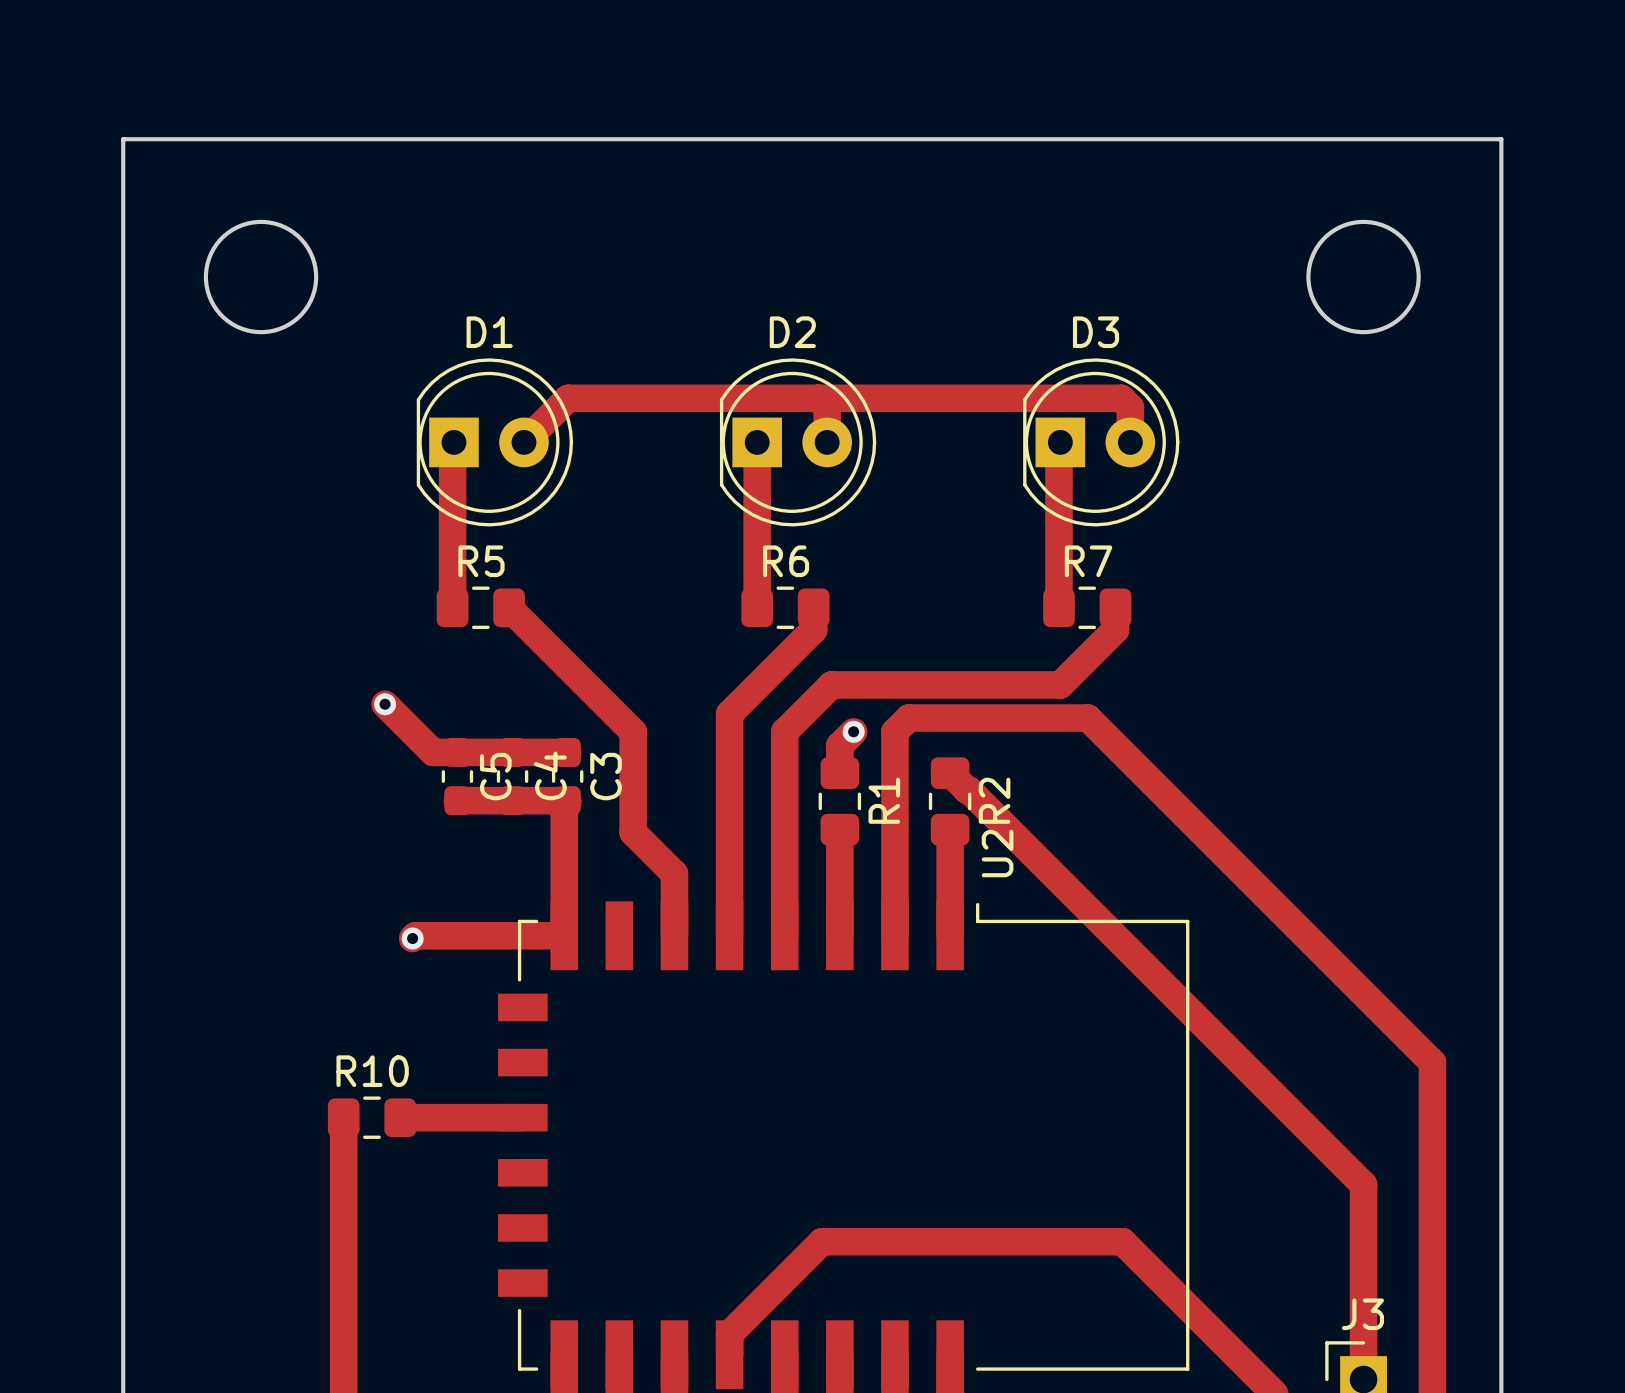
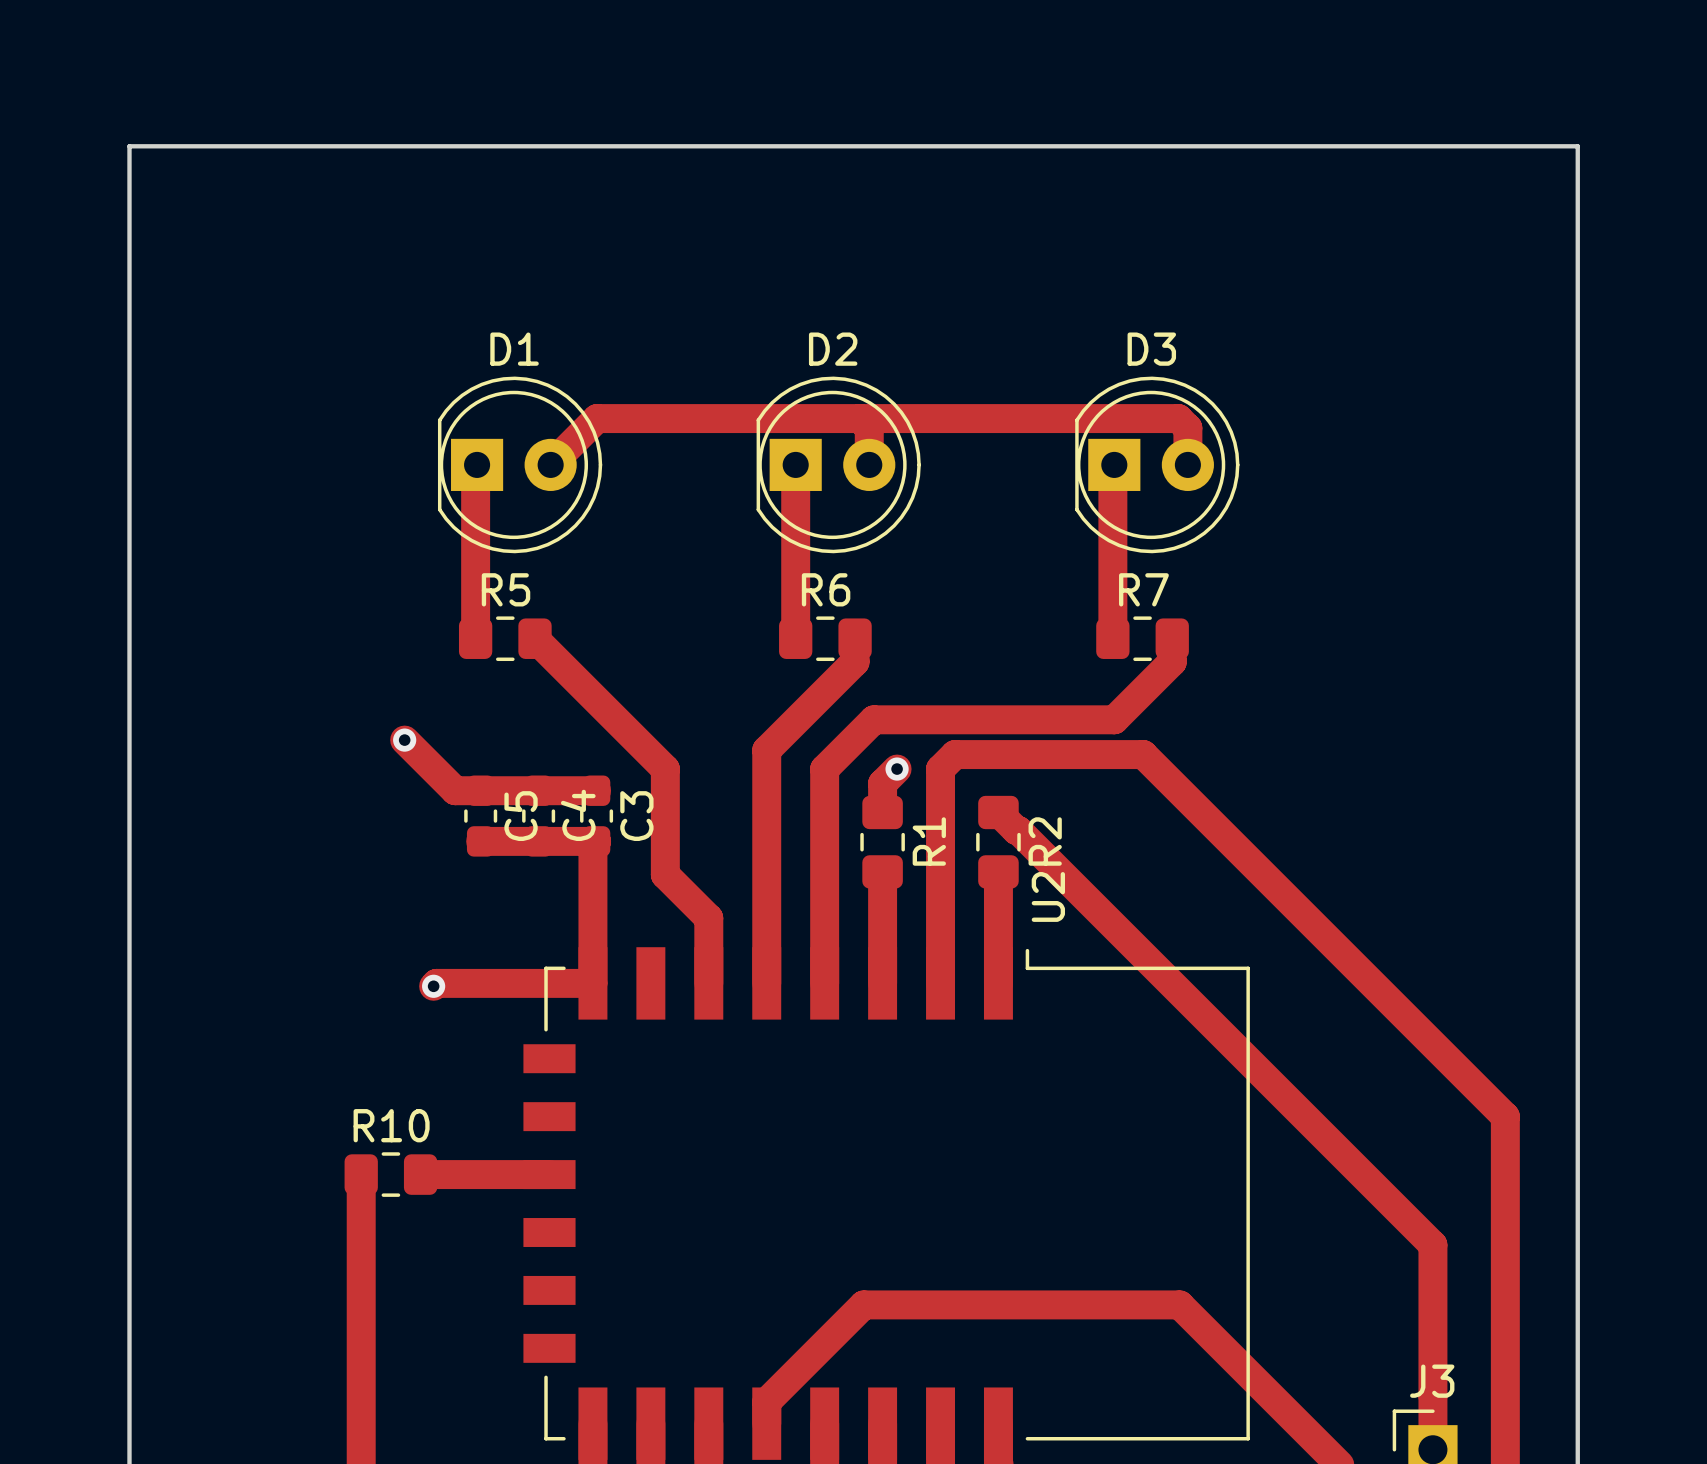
round board edge: [203, 219, 319, 335] -> none
round board edge: [1306, 219, 1421, 335] -> none

